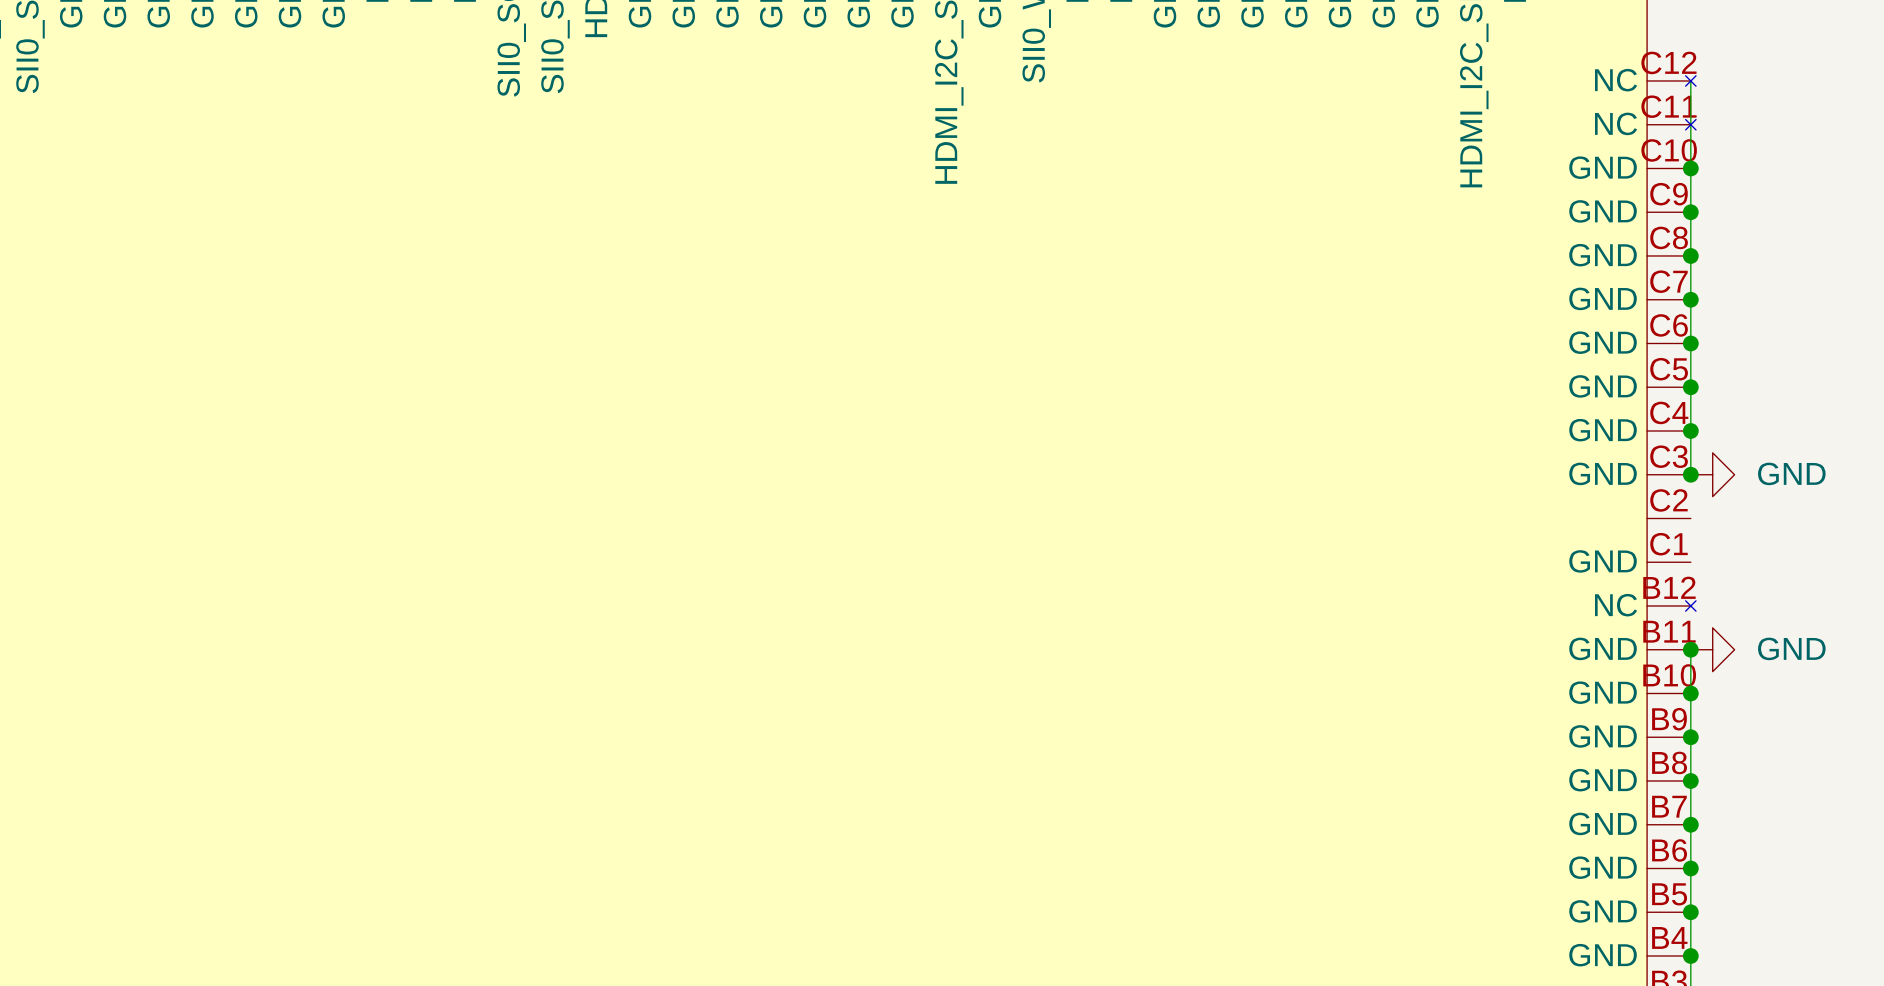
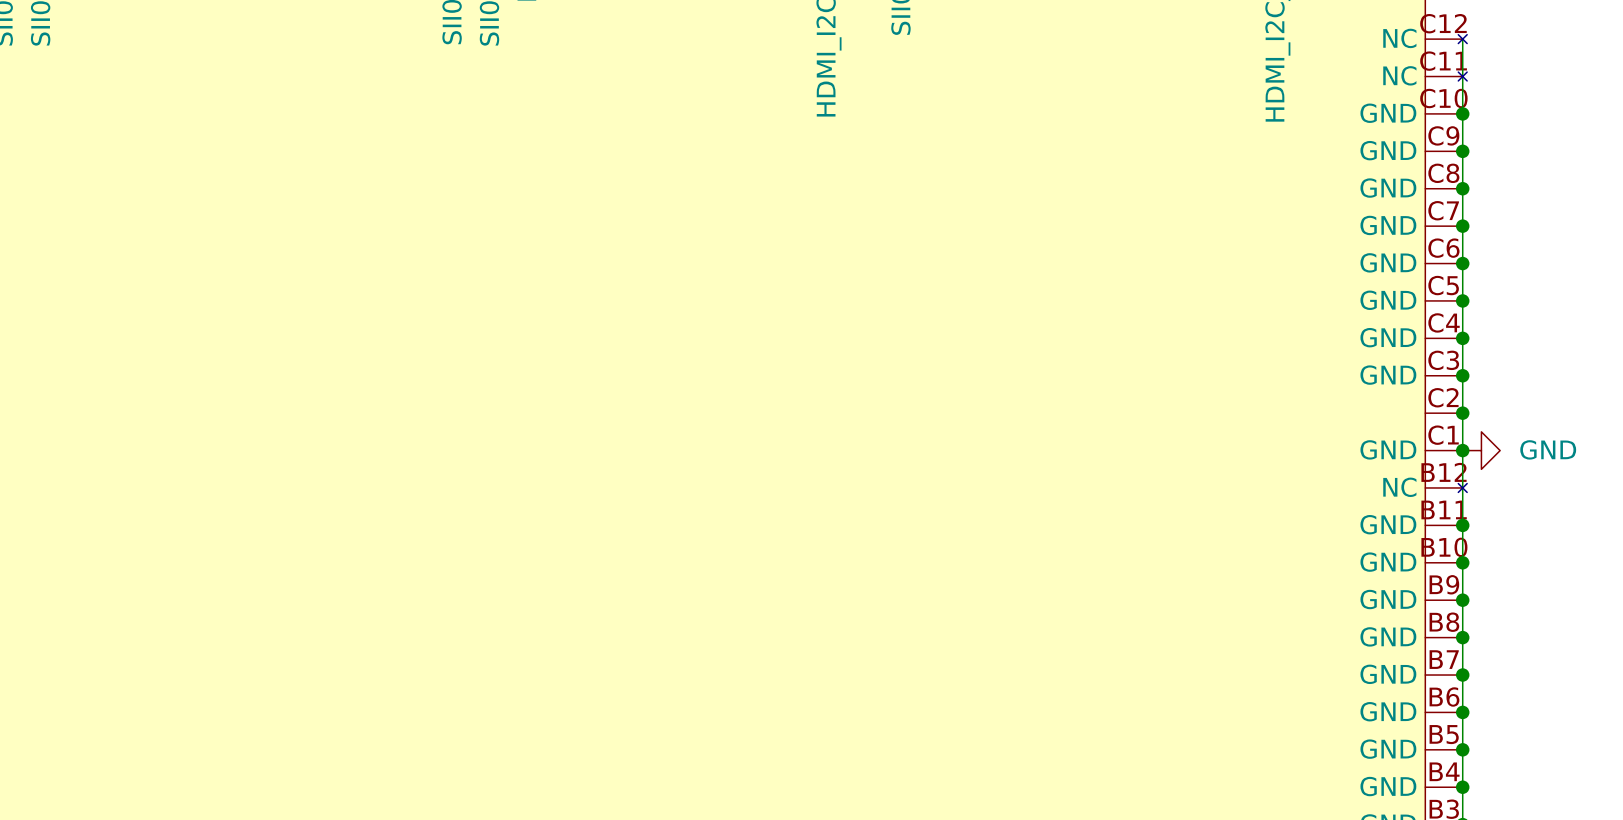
wire: none -> (1462, 375) (1462, 525)
power symbol: GND (1712, 474) -> none
junction: none -> (1462, 413)
junction: none -> (1462, 450)
power symbol: none -> GND (1481, 450)
power symbol: GND (1712, 649) -> none

